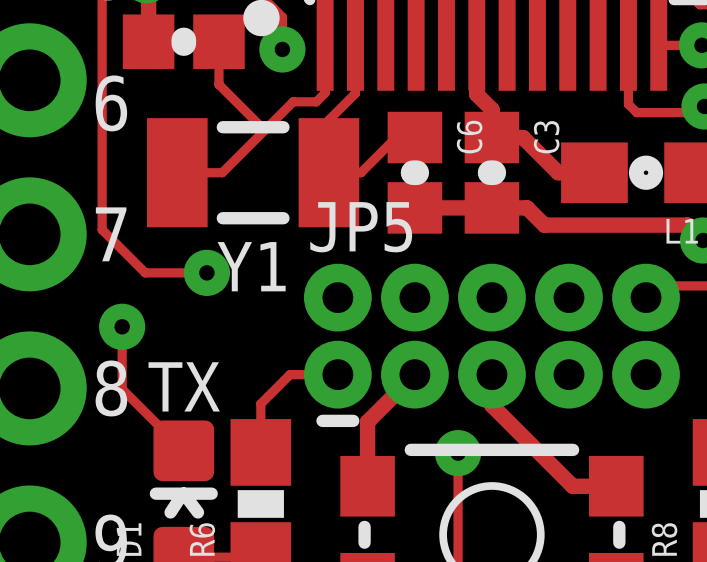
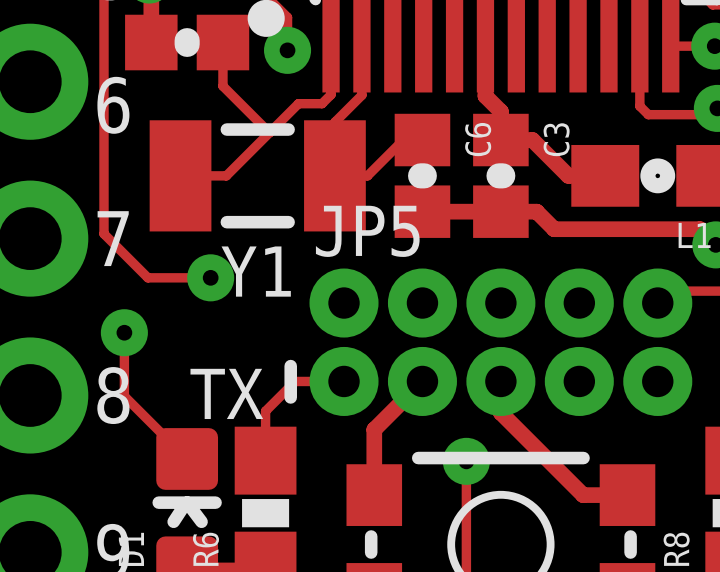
JP5 footprint: [303, 263, 680, 428] -> [284, 268, 693, 416]
text position: TX (184, 386) -> TX (226, 393)

